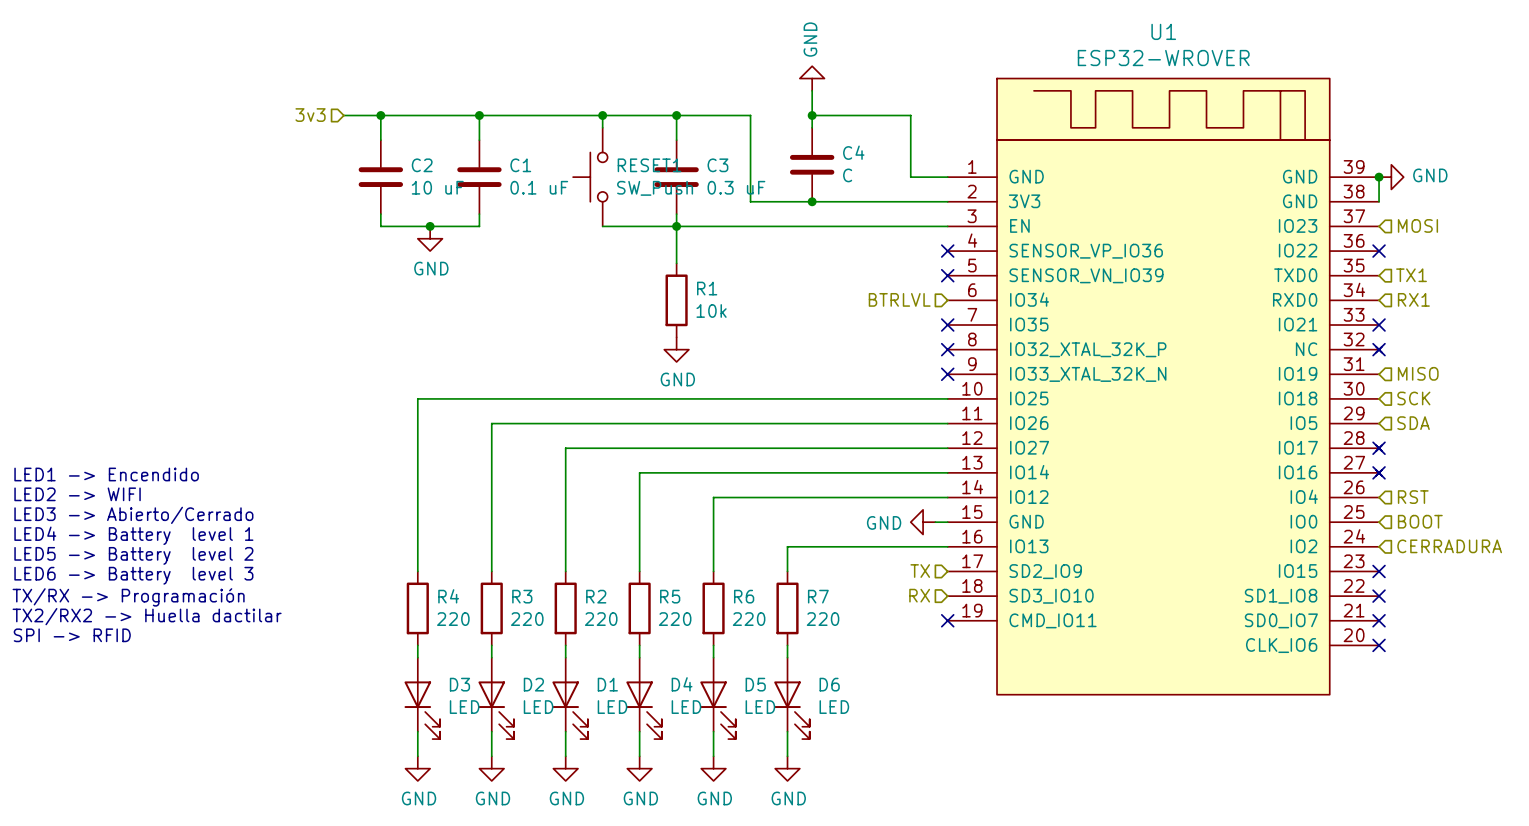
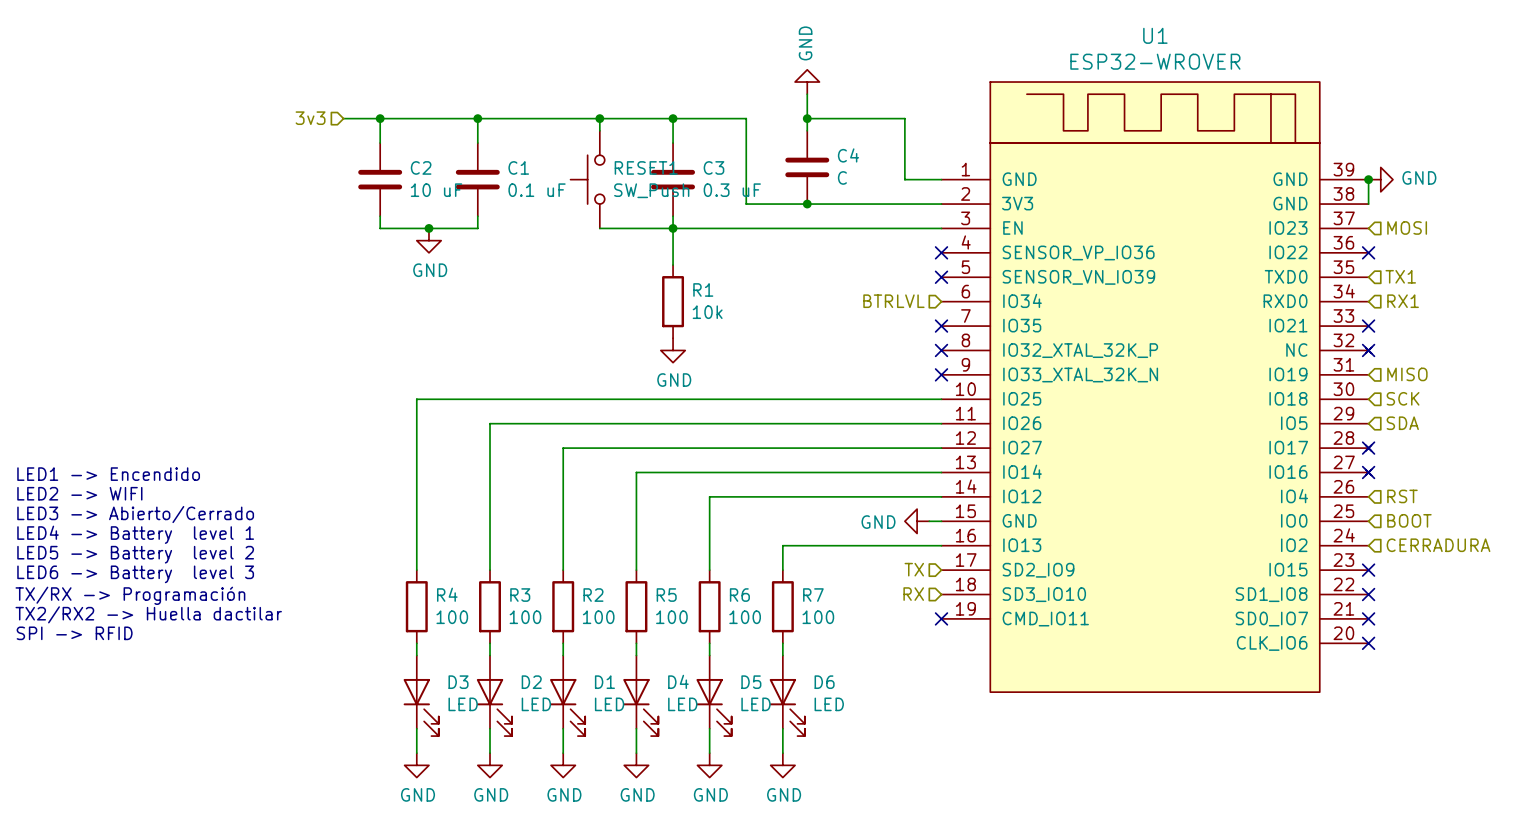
R4 value: 220 (453, 619) -> 100 (452, 617)
R3 value: 220 (527, 619) -> 100 (525, 617)
R2 value: 220 (601, 619) -> 100 (598, 617)
R5 value: 220 (675, 619) -> 100 (671, 617)
R6 value: 220 (749, 619) -> 100 (745, 617)
R7 value: 220 (823, 619) -> 100 (818, 617)

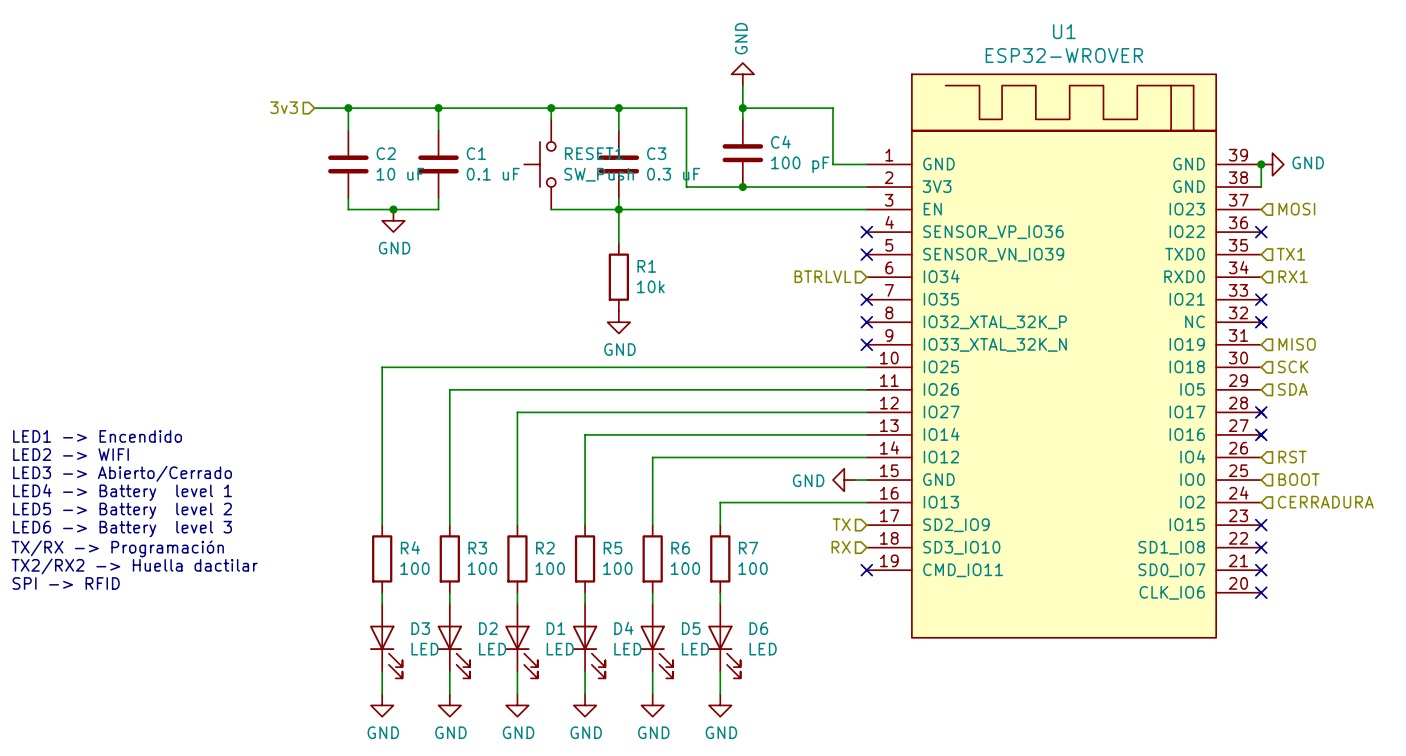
C4 value: C (842, 177) -> 100 pF (800, 164)

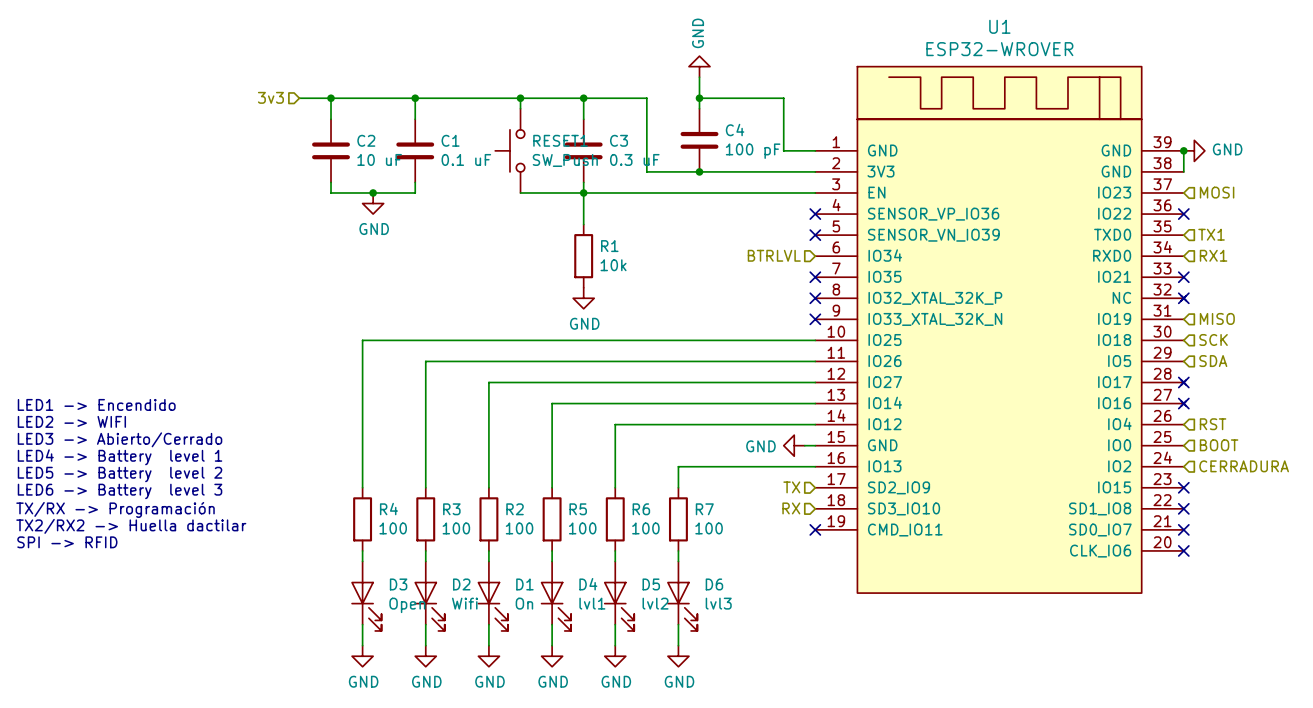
D3 value: LED (425, 649) -> Open (407, 605)
D2 value: LED (492, 649) -> Wifi (465, 603)
D1 value: LED (560, 649) -> On (524, 603)
D4 value: LED (627, 649) -> lvl1 (592, 603)
D5 value: LED (695, 649) -> lvl2 (655, 603)
D6 value: LED (763, 649) -> lvl3 (718, 603)

